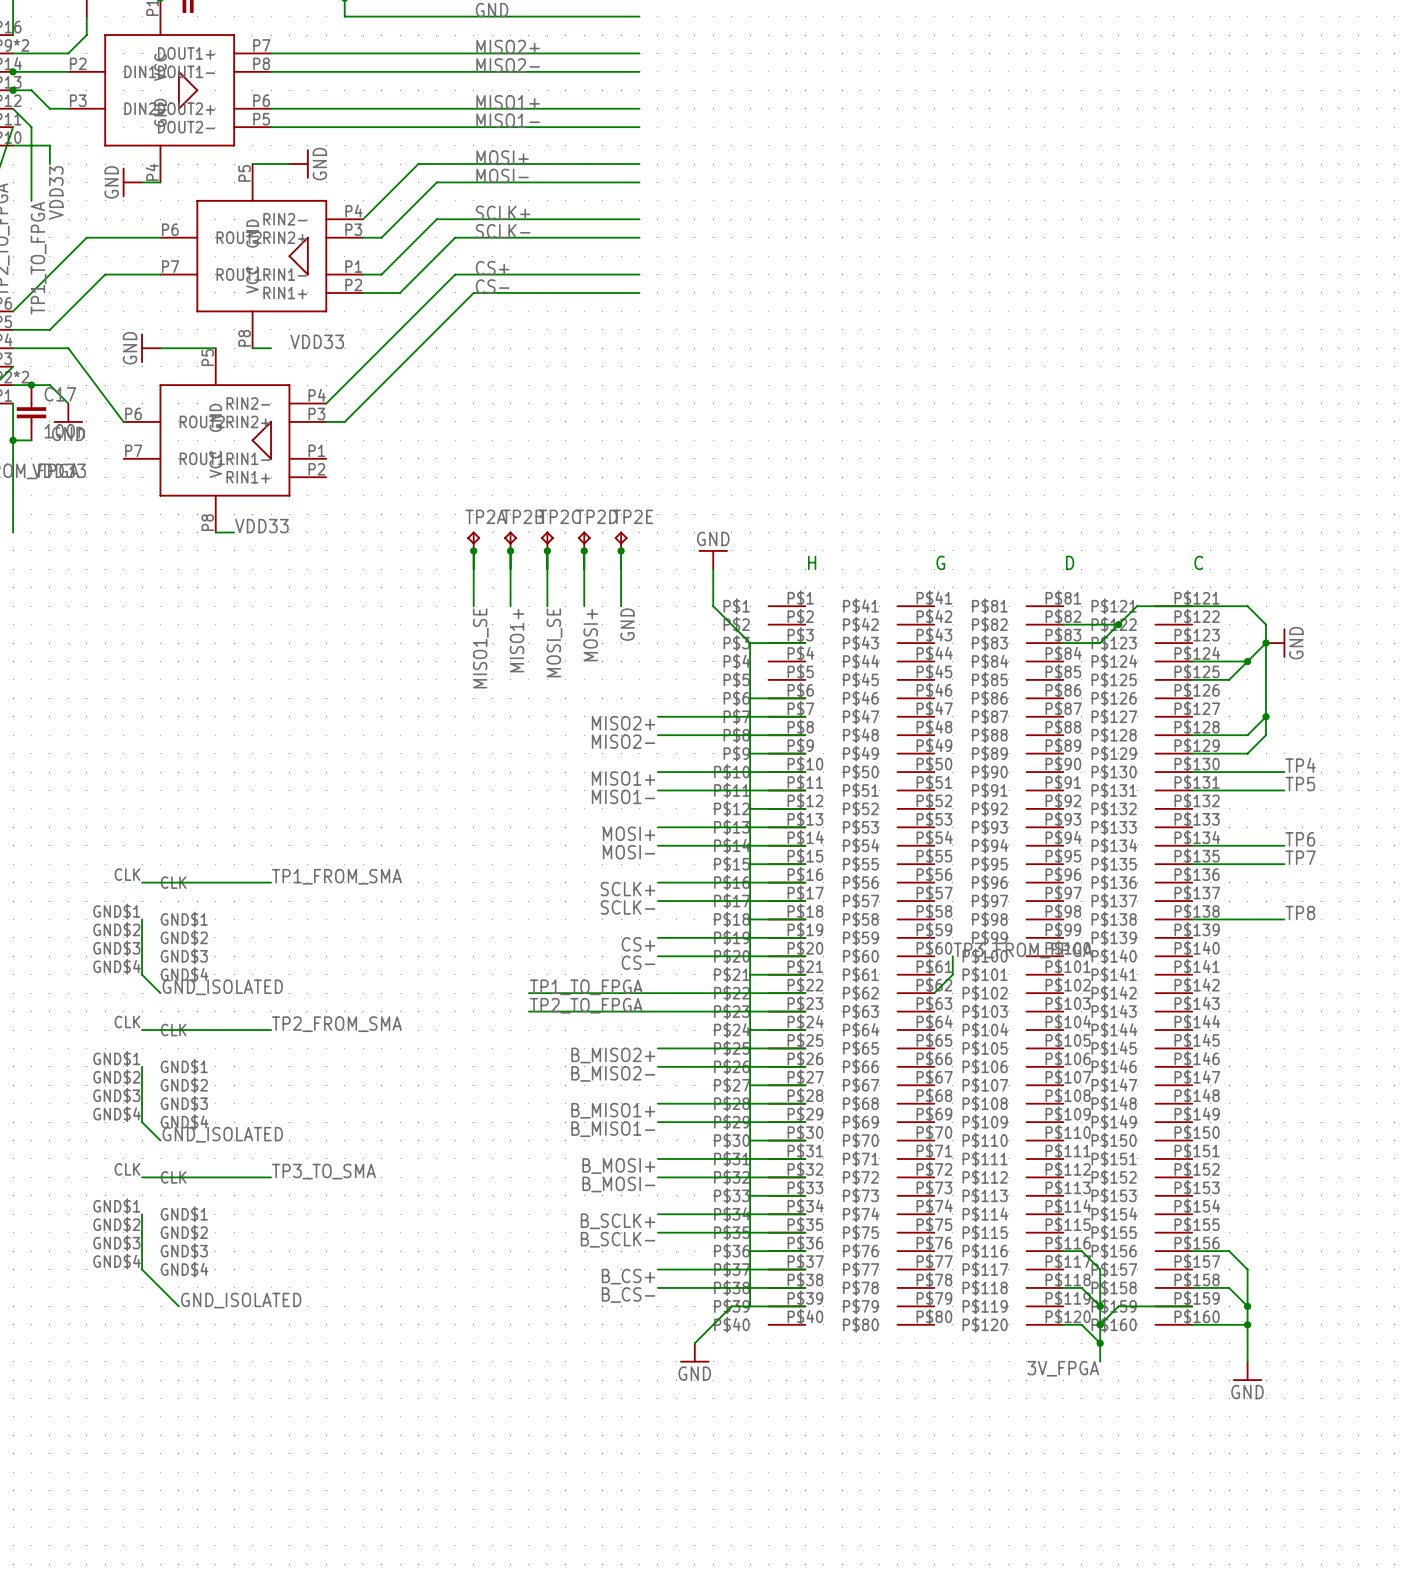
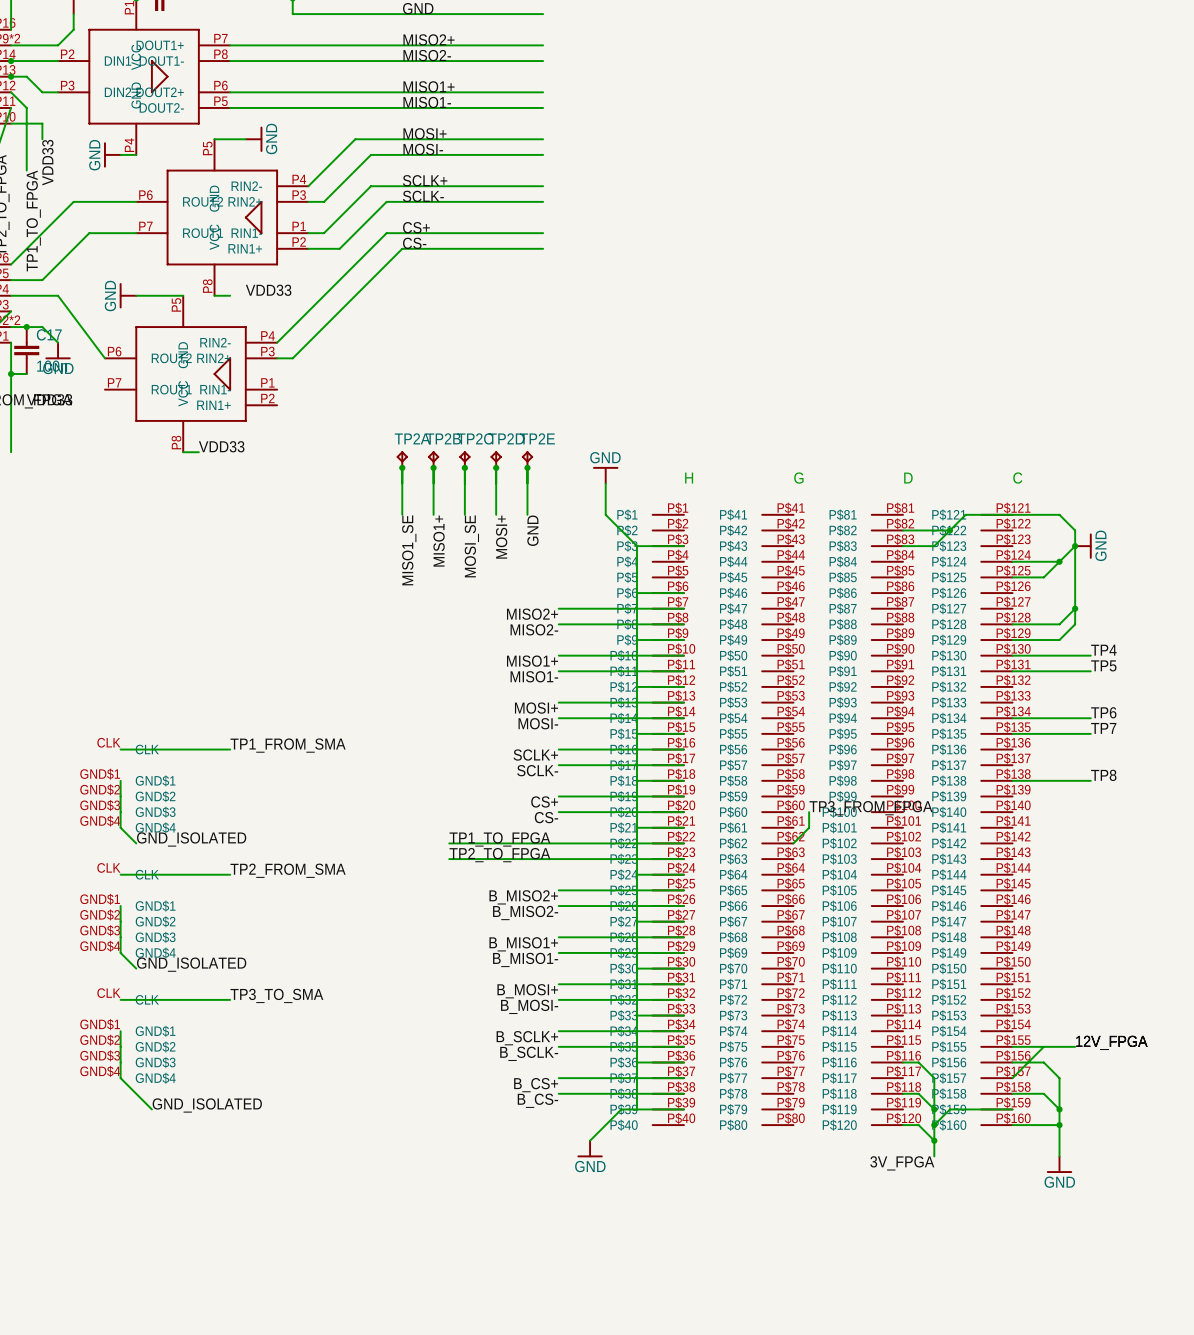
label: none -> 12V_FPGA (1111, 1042)
wire: none -> (1012, 1046) (1075, 1046)
wire: none -> (1043, 1046) (1012, 1078)

